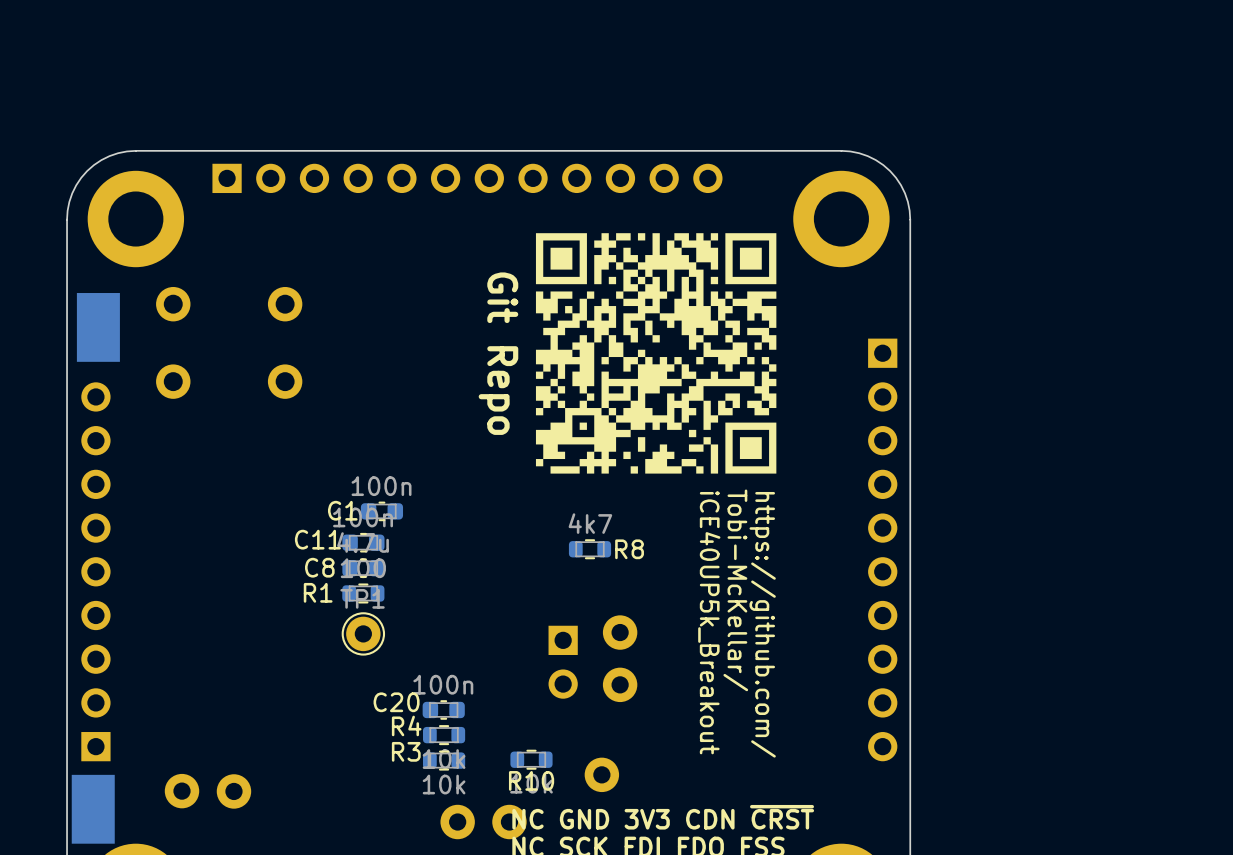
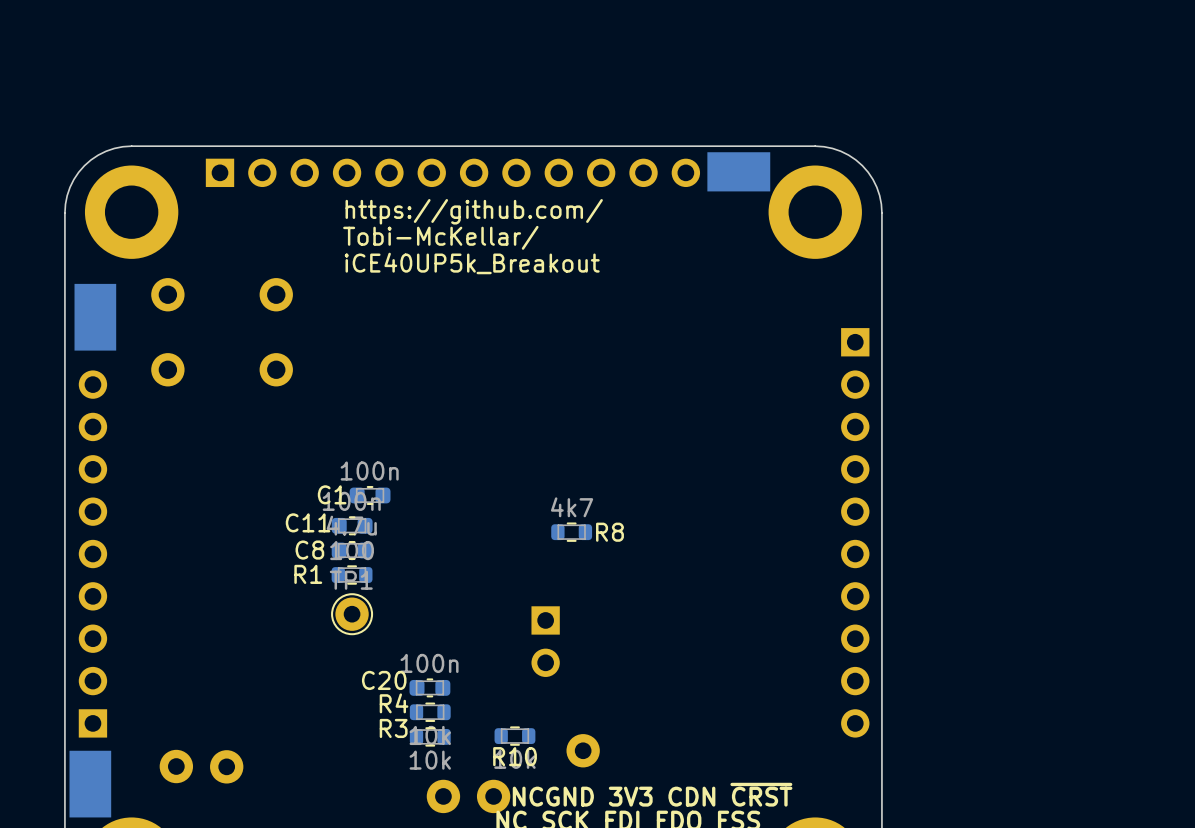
part: none -> (738, 171)
text: none -> https://github.com/ (474, 211)
drawing: [535, 233, 777, 474] -> none
text: none -> Tobi-McKellar/ (440, 237)
text: Git Repo (498, 353) -> none
text: Tobi-McKellar/ (735, 590) -> none
text rotation: 0° (709, 622) -> 90° counterclockwise (472, 263)
text position: iCE40UP5k_Breakout (709, 622) -> iCE40UP5k_Breakout (472, 263)
text: https://github.com/ (762, 624) -> none
part: (620, 632) -> none
part: (620, 684) -> none
text: NC GND 3V3 CDN ~{CRST} (663, 817) -> NCGND 3V3 CDN ~{CRST} (652, 794)

